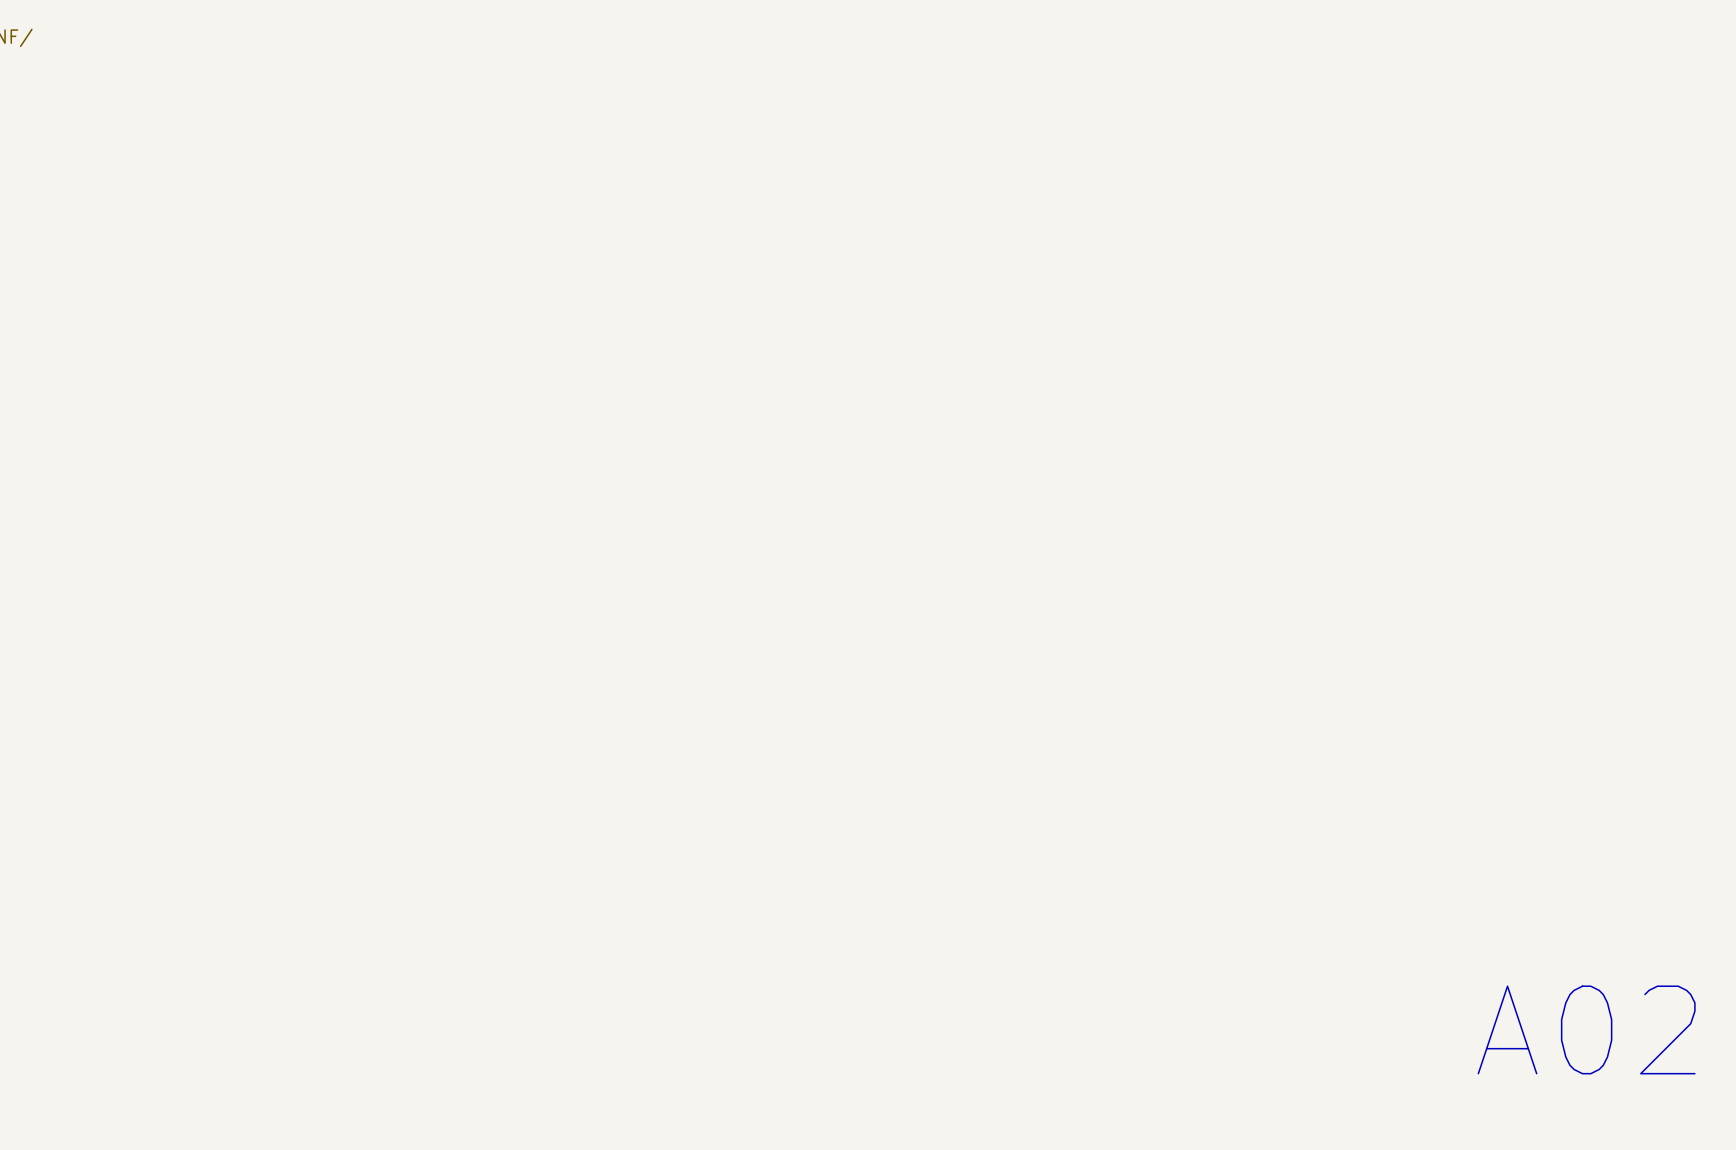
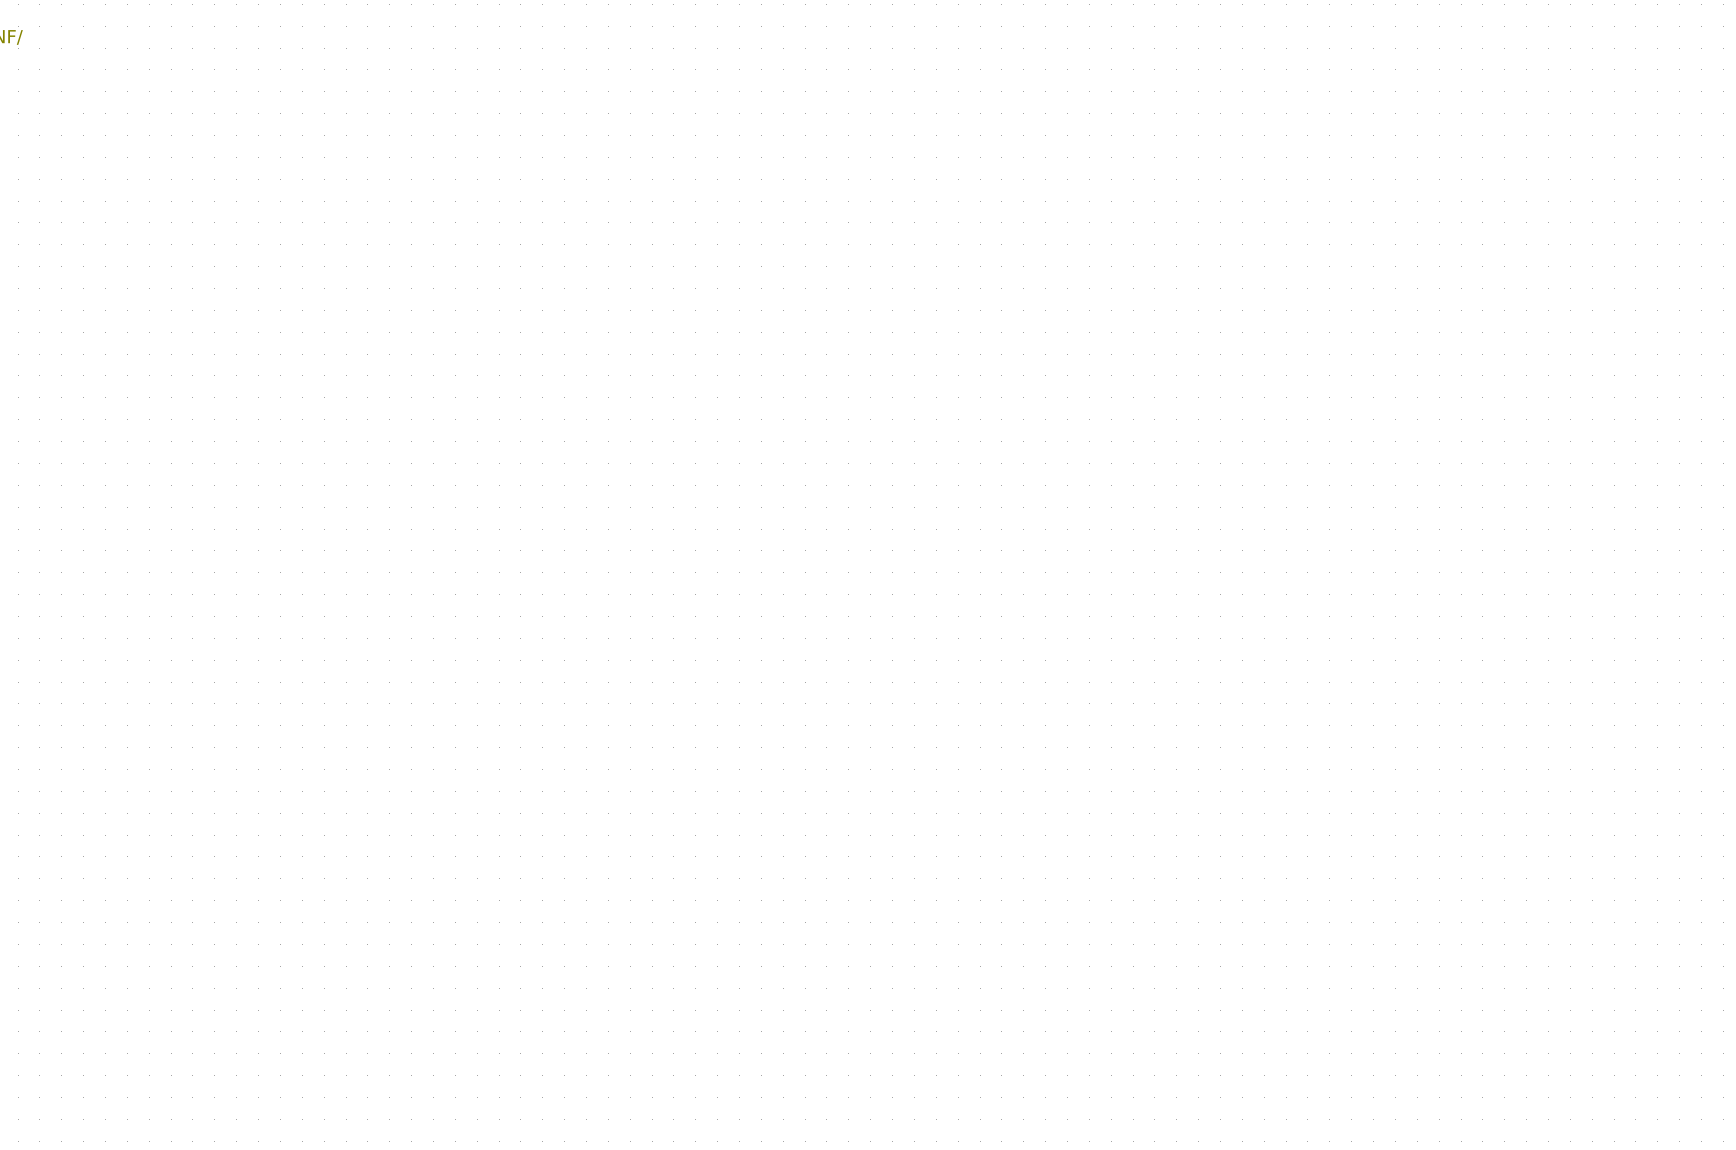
text: A02 (1586, 1029) -> none

